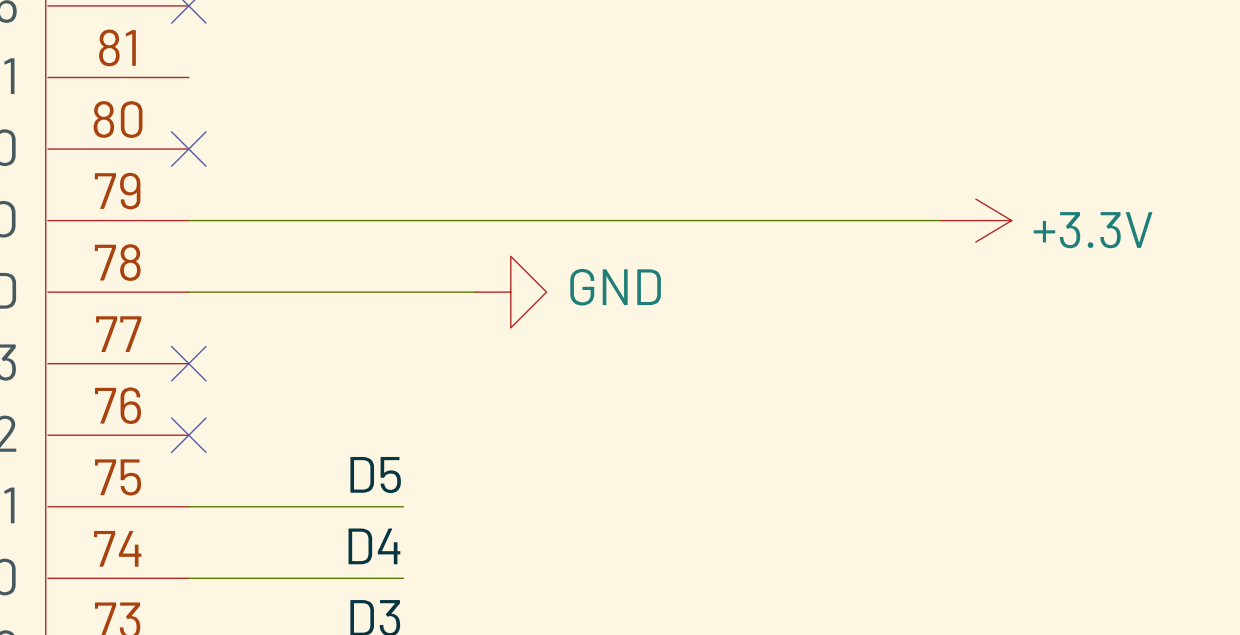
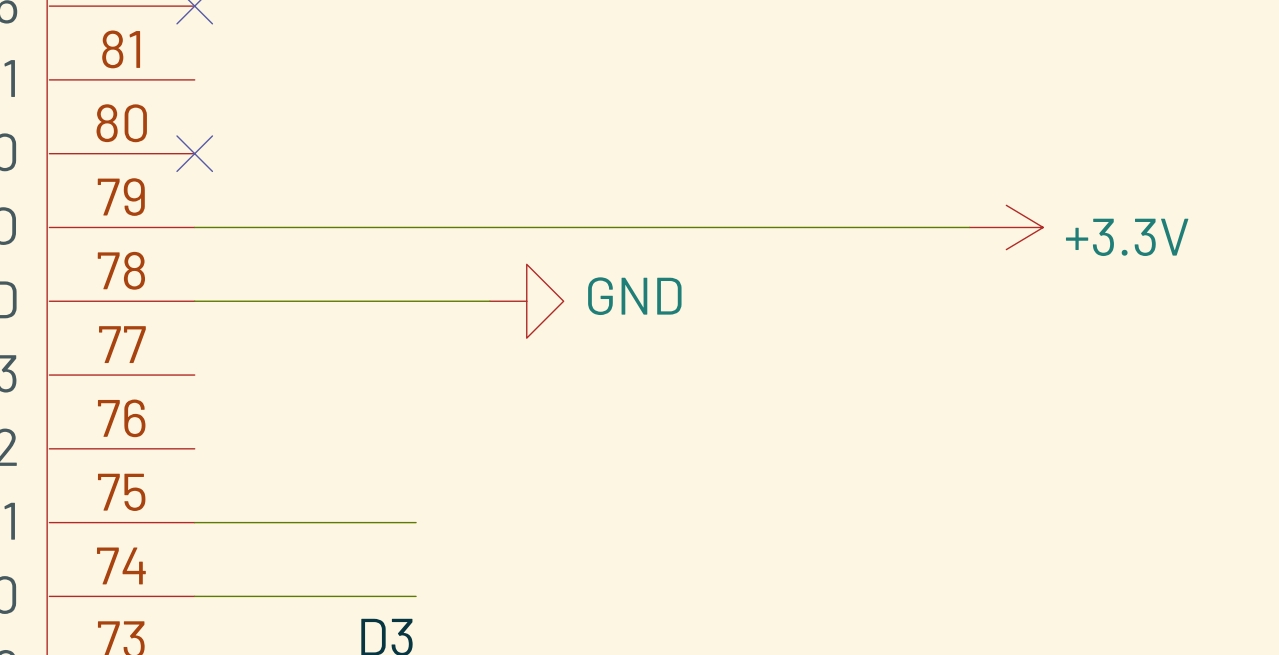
no-connect mark: (188, 363) -> none
no-connect mark: (188, 435) -> none
label: D5 (375, 475) -> none
label: D4 (374, 546) -> none

